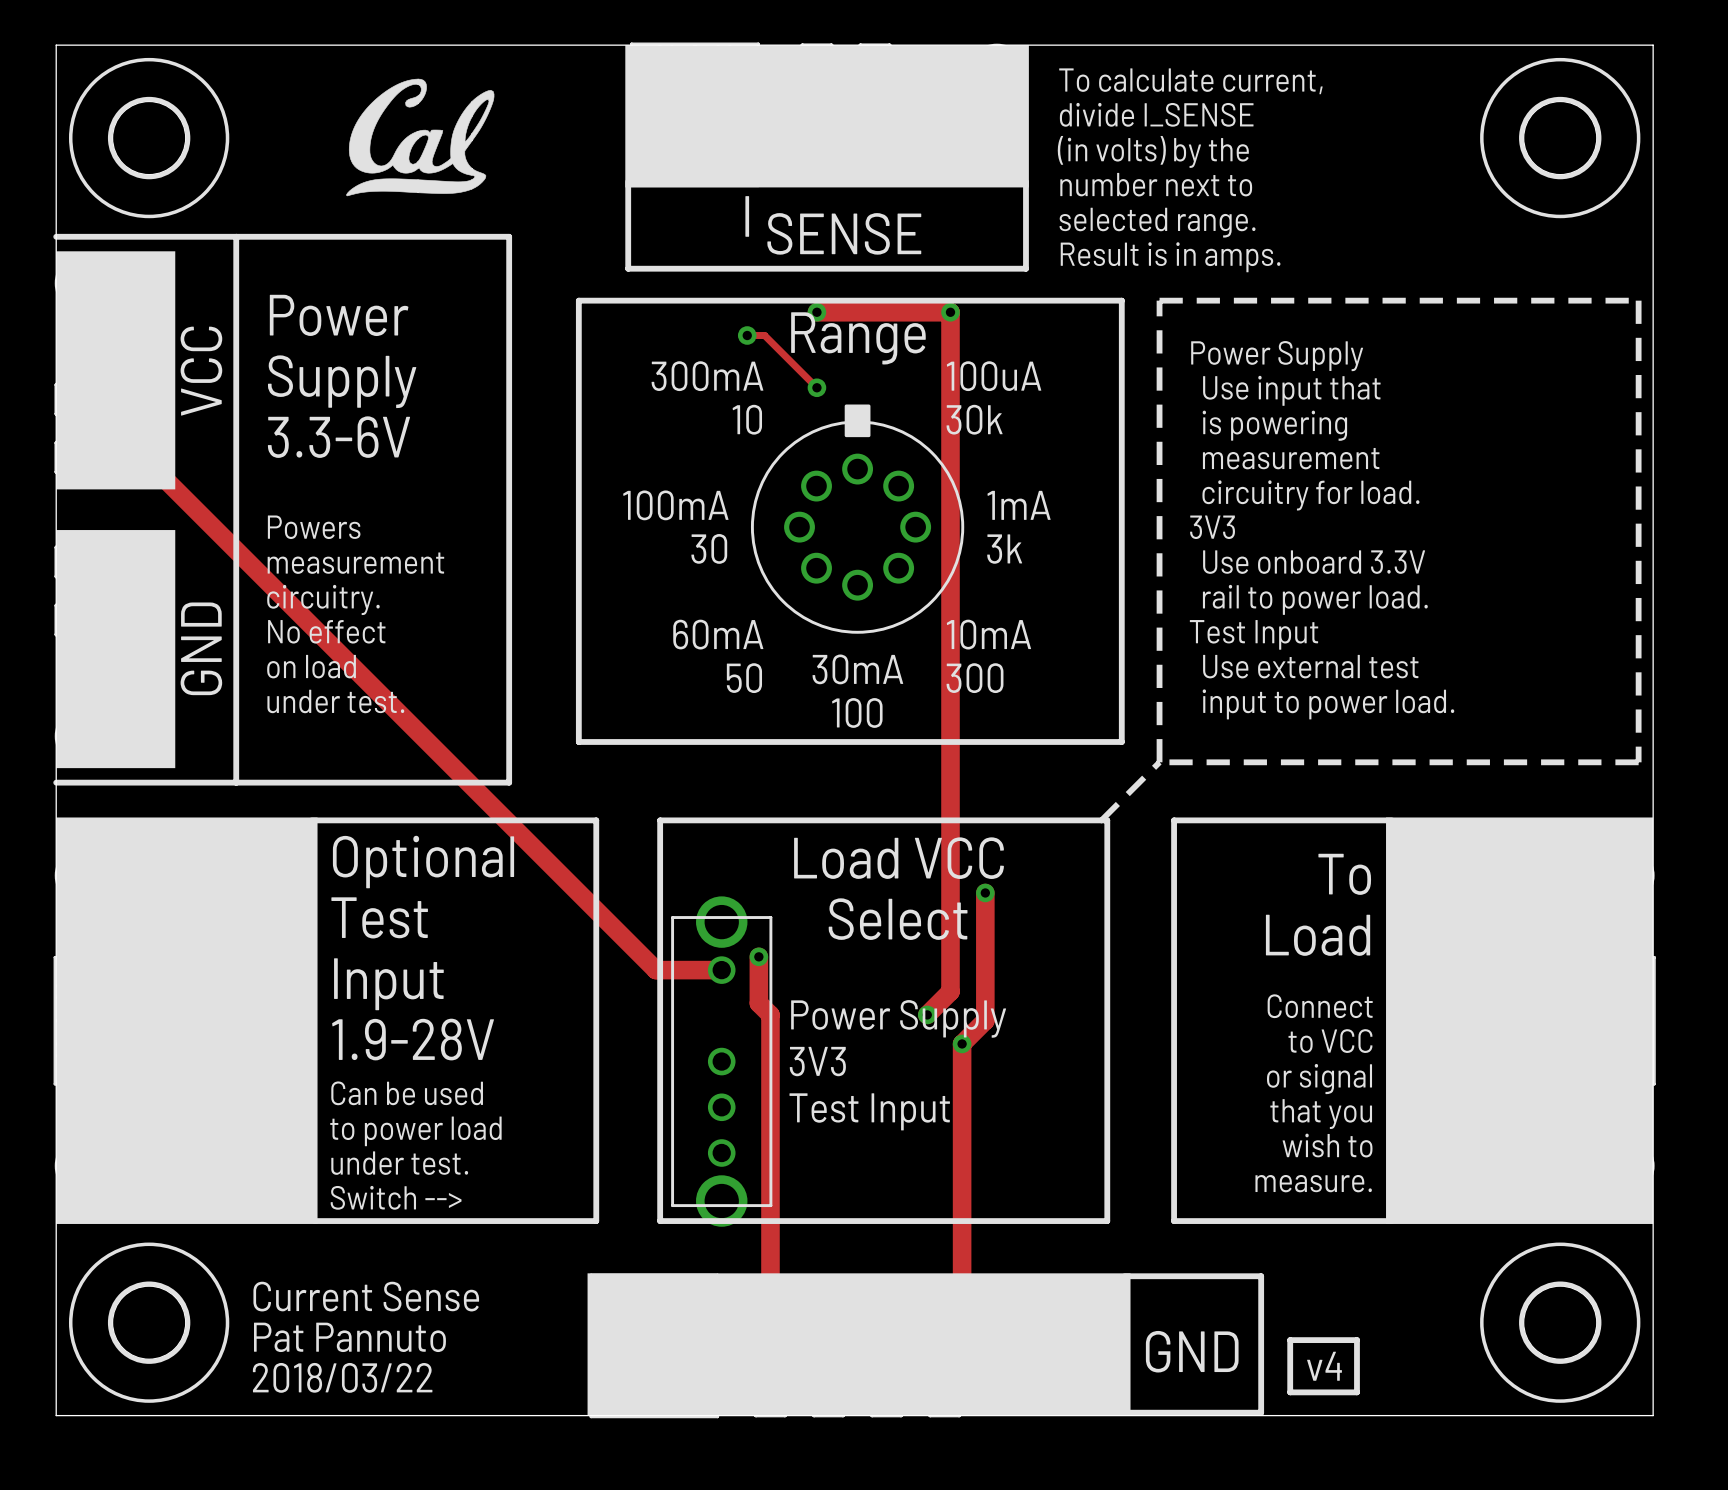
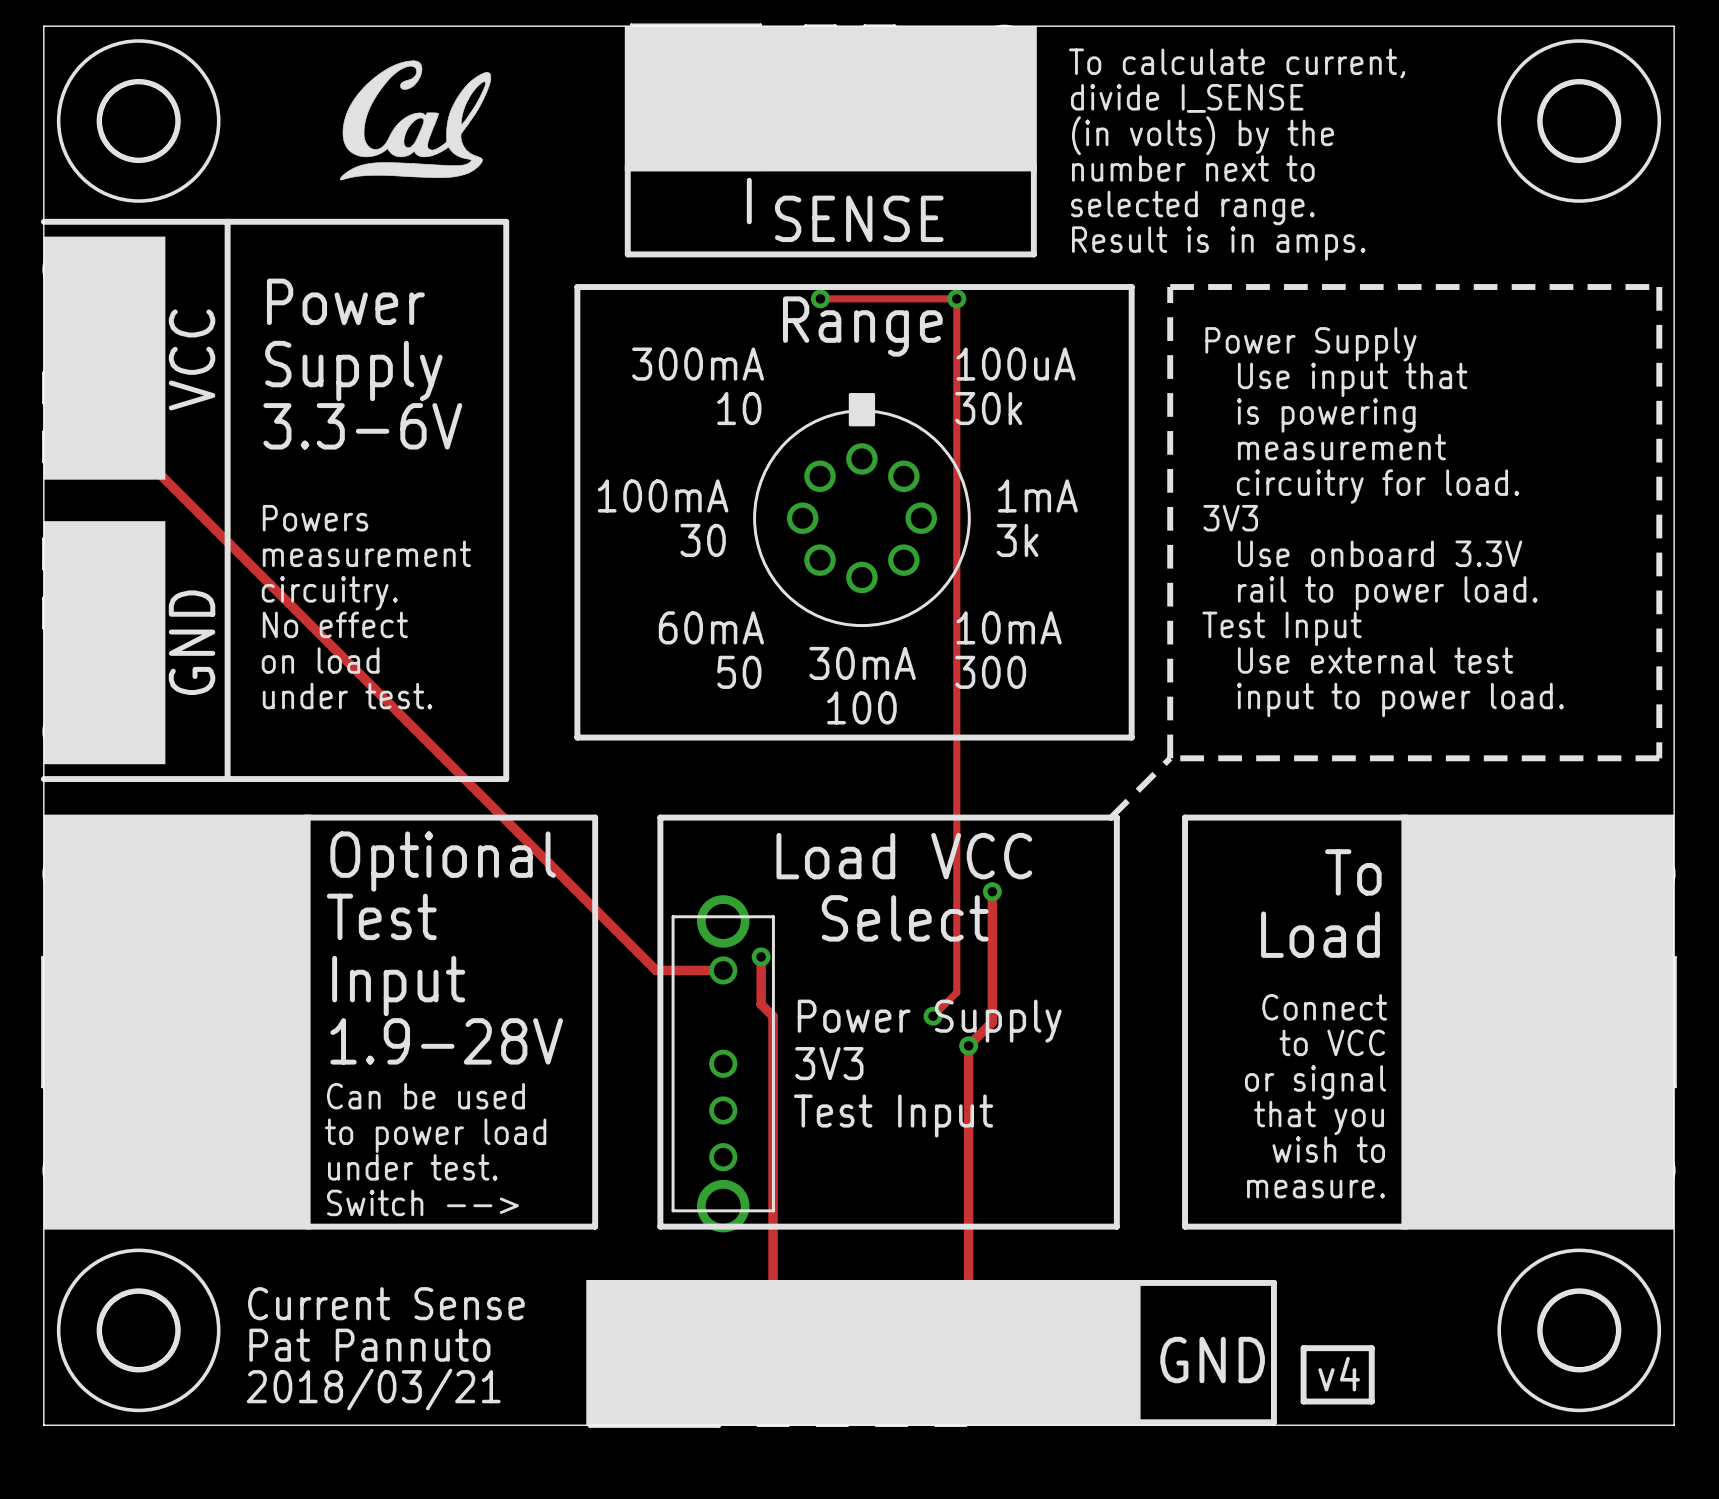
track width: thick (816, 312) (950, 312) (950, 991) (927, 1014) -> thin (820, 298) (956, 298) (956, 992) (933, 1016)
track: (747, 335) (764, 335) (816, 387) -> none
via: (747, 335) -> none
via: (816, 387) -> none
track width: thick (143, 457) (655, 970) (721, 970) -> thin (132, 447) (656, 970) (723, 970)
track width: thick (985, 892) (985, 1020) (962, 1043) (962, 1311) (944, 1328) -> thin (992, 891) (992, 1022) (968, 1045) (968, 1318) (950, 1336)
track width: thick (758, 956) (758, 1003) (770, 1014) (770, 1328) -> thin (761, 956) (761, 1004) (773, 1016) (773, 1336)
text: 2018/03/22 (342, 1377) -> 2018/03/21 (373, 1389)

